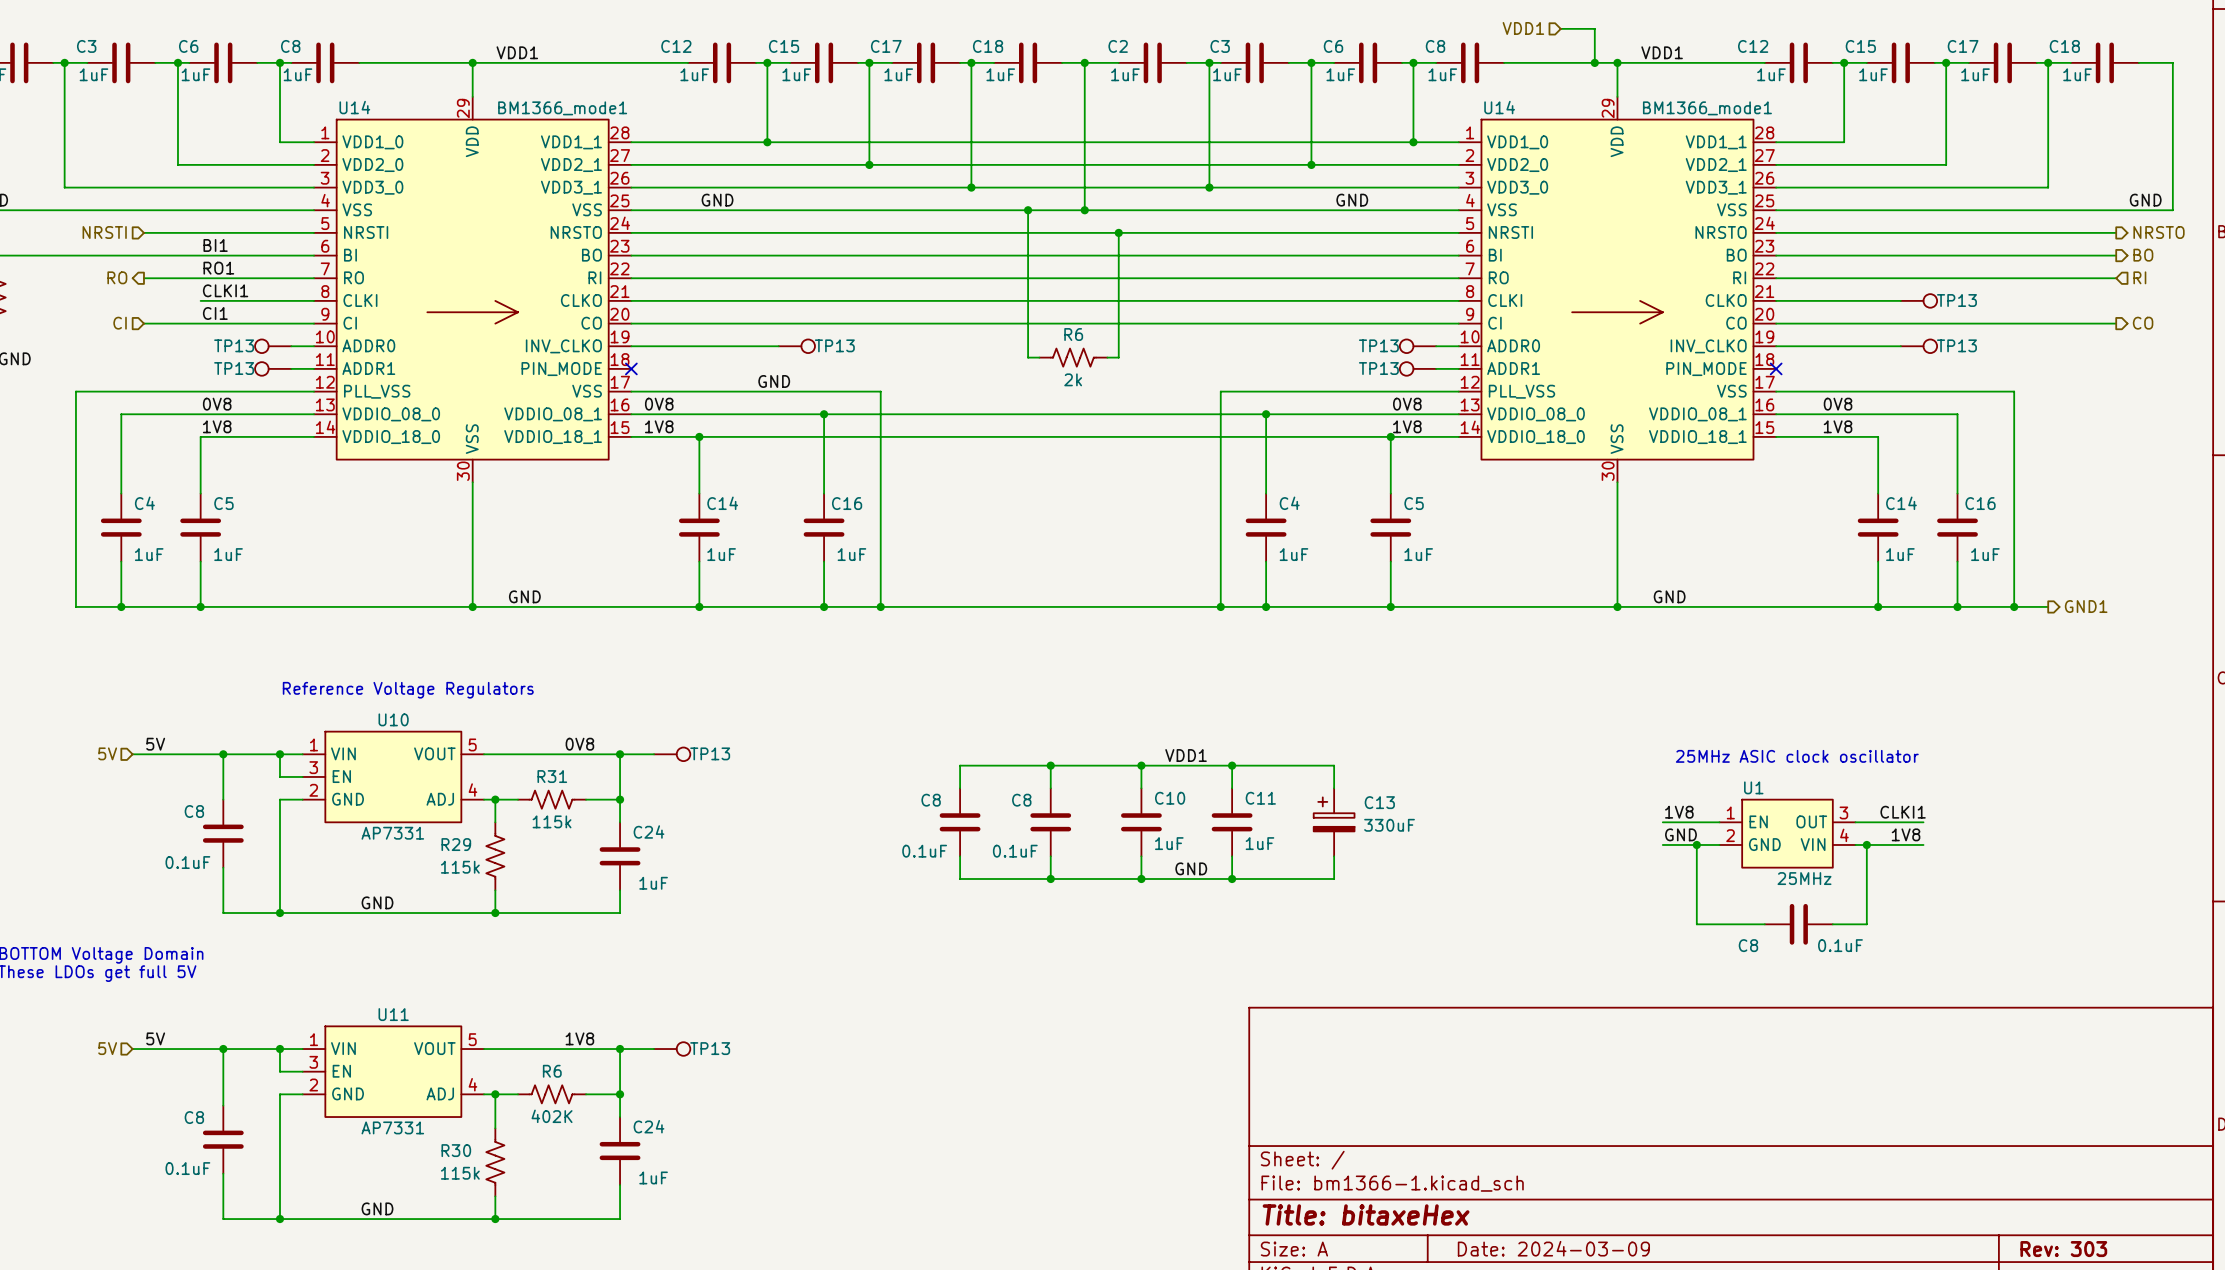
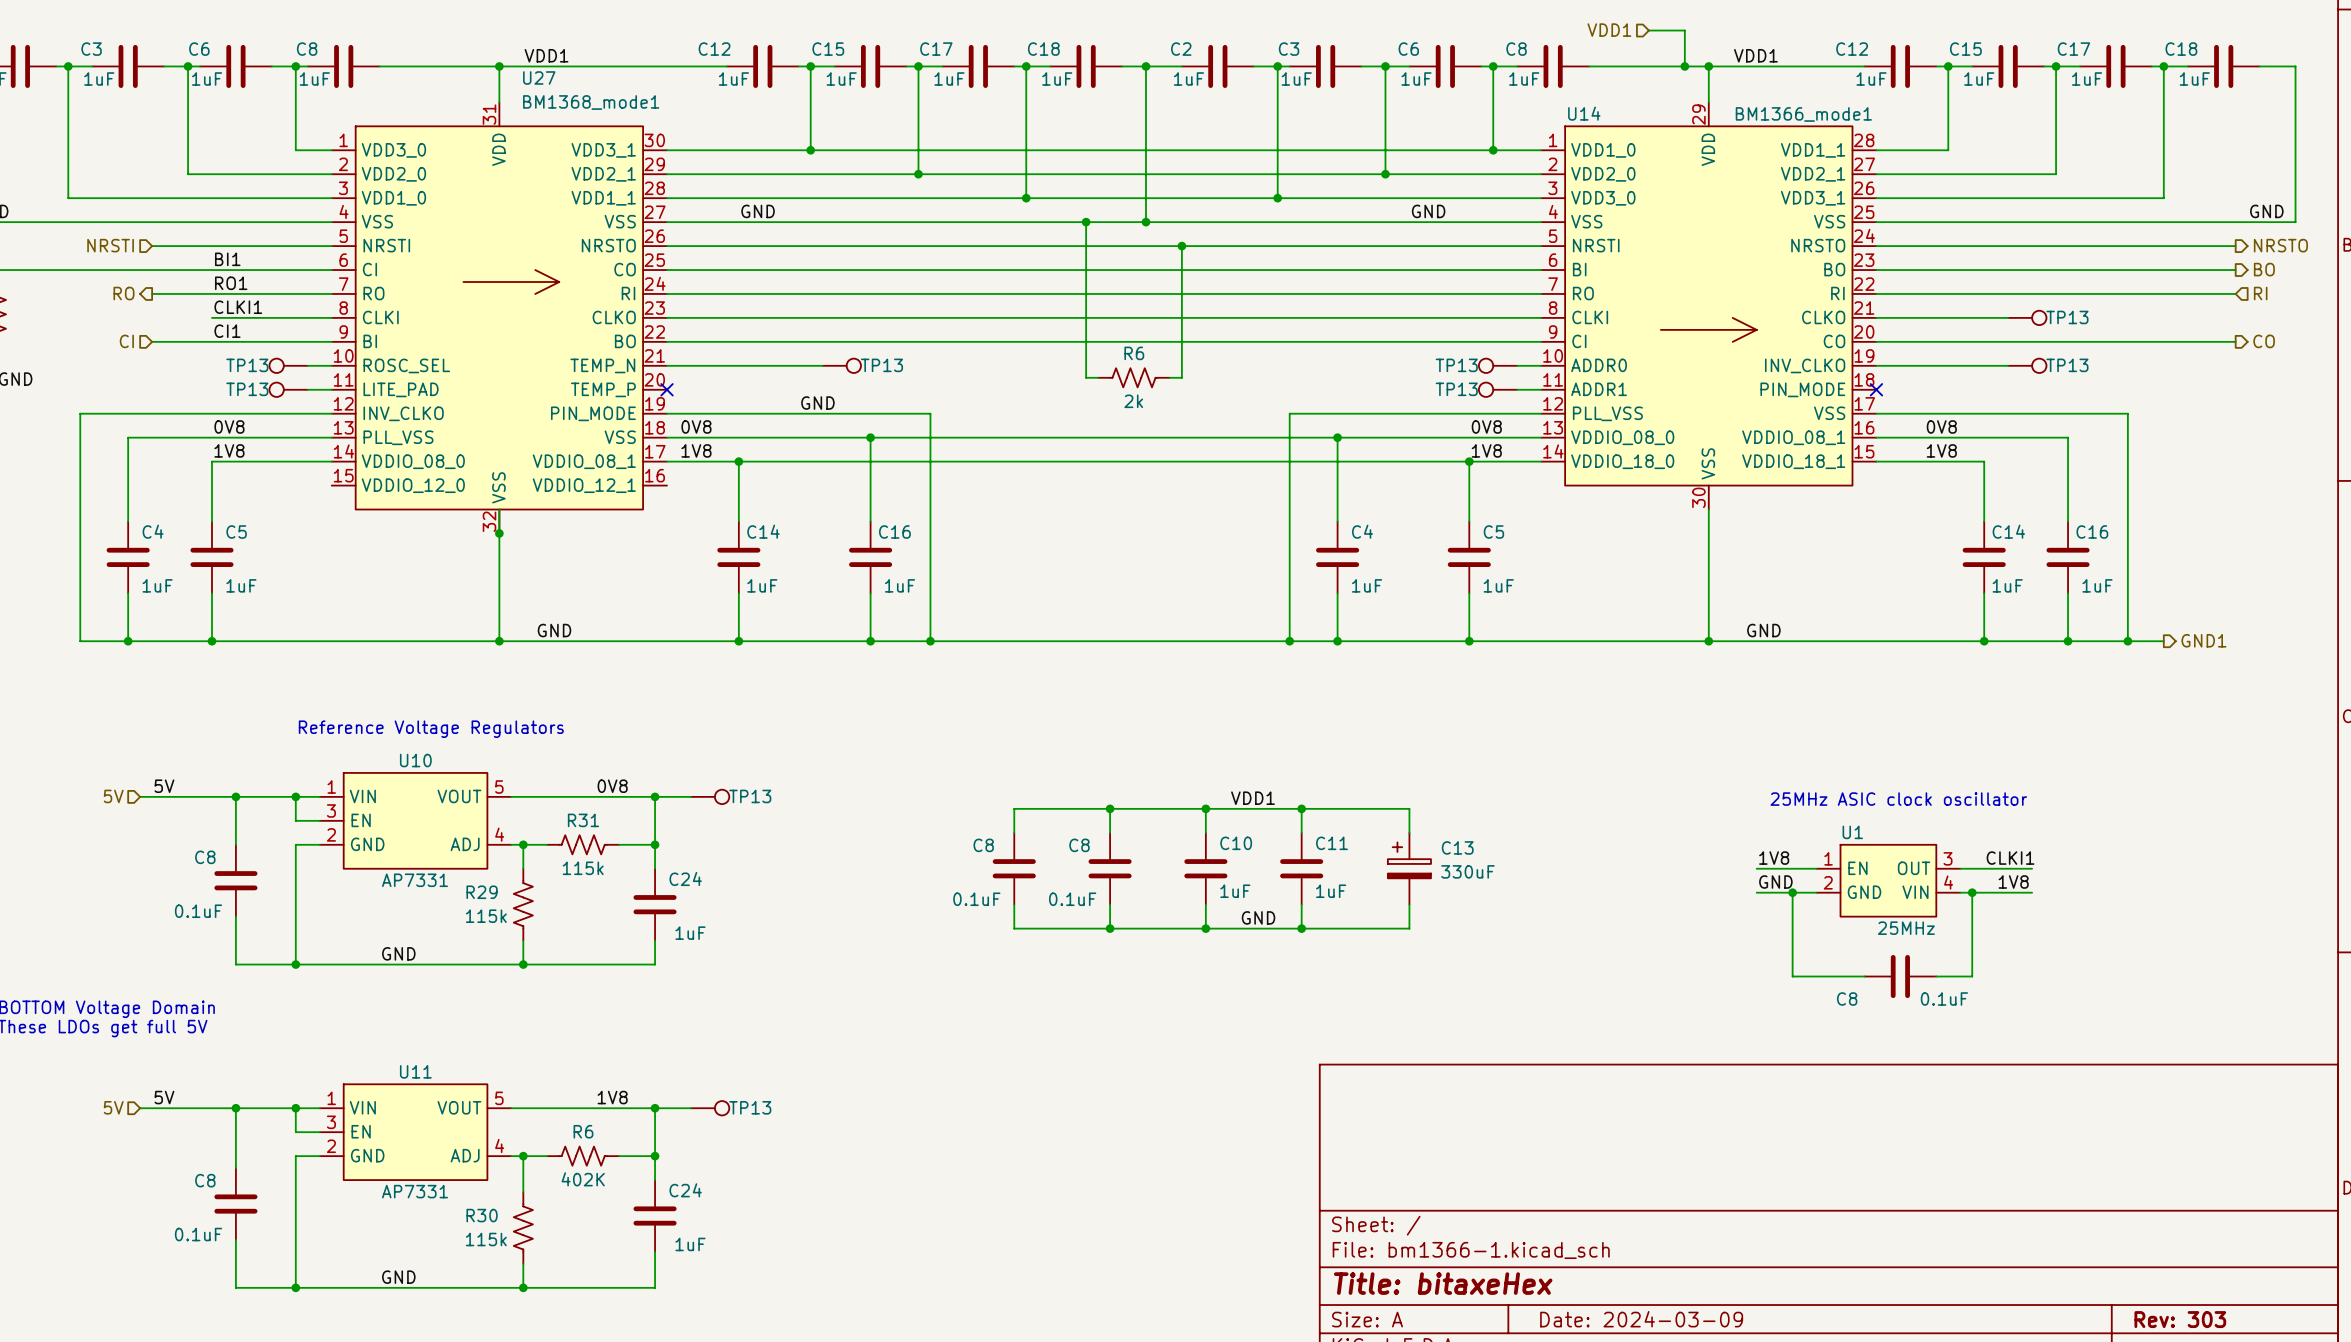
U14: BM1366_mode1 (472, 289) -> none
U27: none -> BM1368_mode1 (499, 317)
junction: none -> (499, 533)

